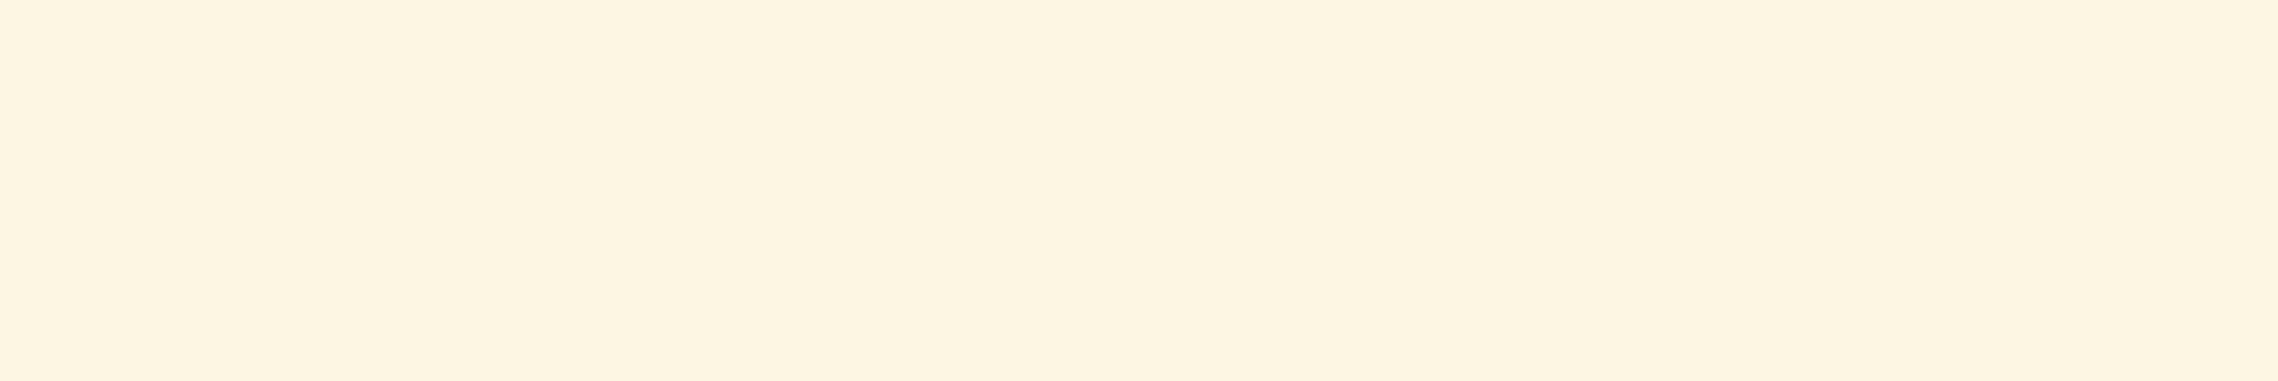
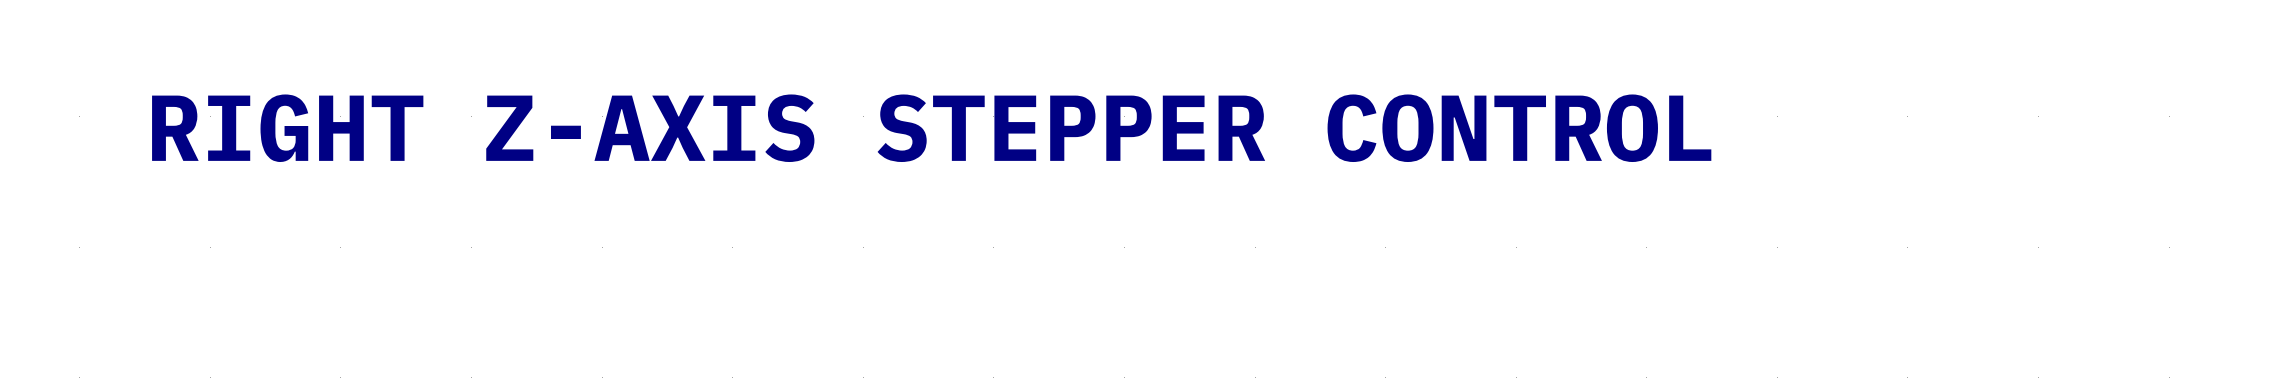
text: none -> RIGHT Z-AXIS STEPPER CONTROL (931, 128)

